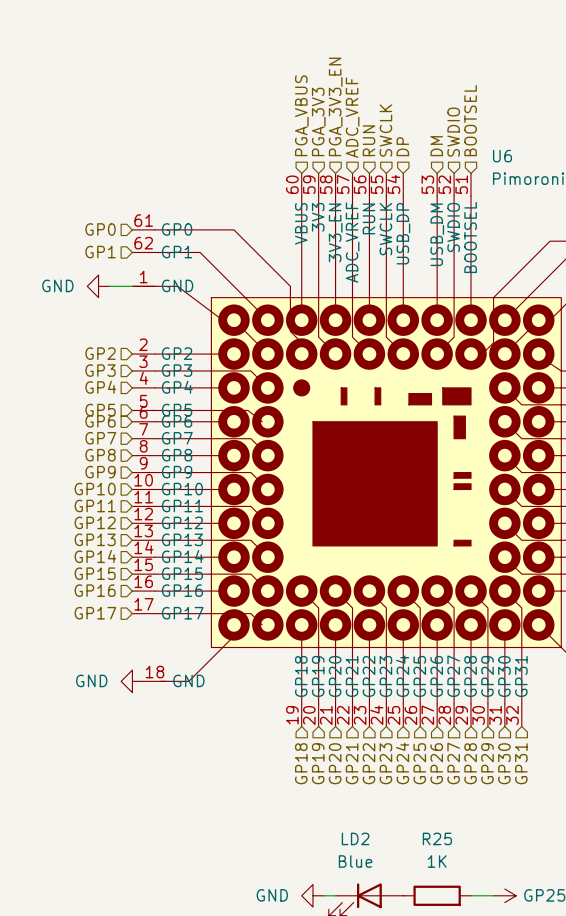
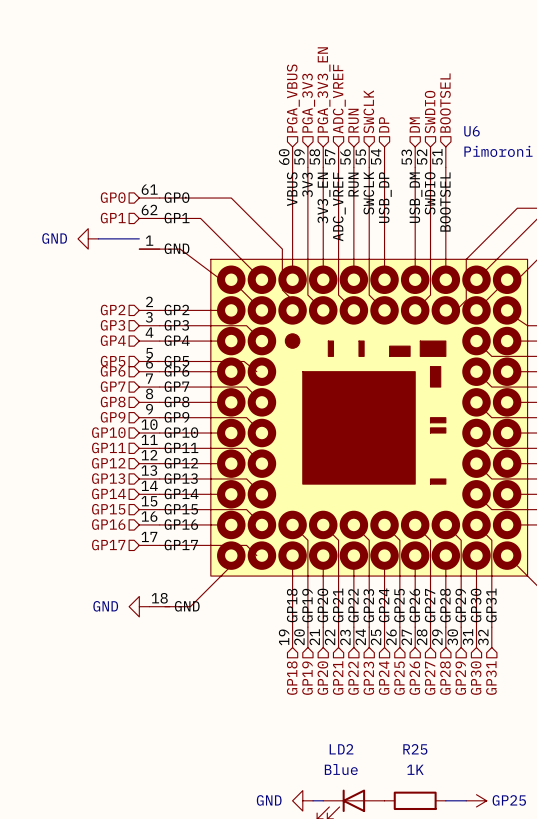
wire: none -> (98, 238) (139, 238)
power symbol position: GND (98, 286) -> GND (88, 238)
wire: (109, 286) (132, 286) -> none

